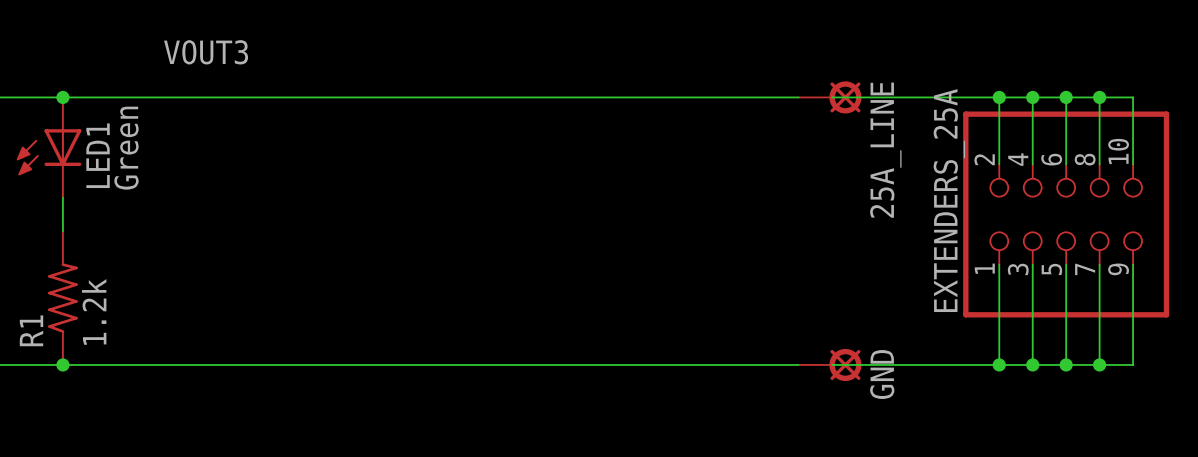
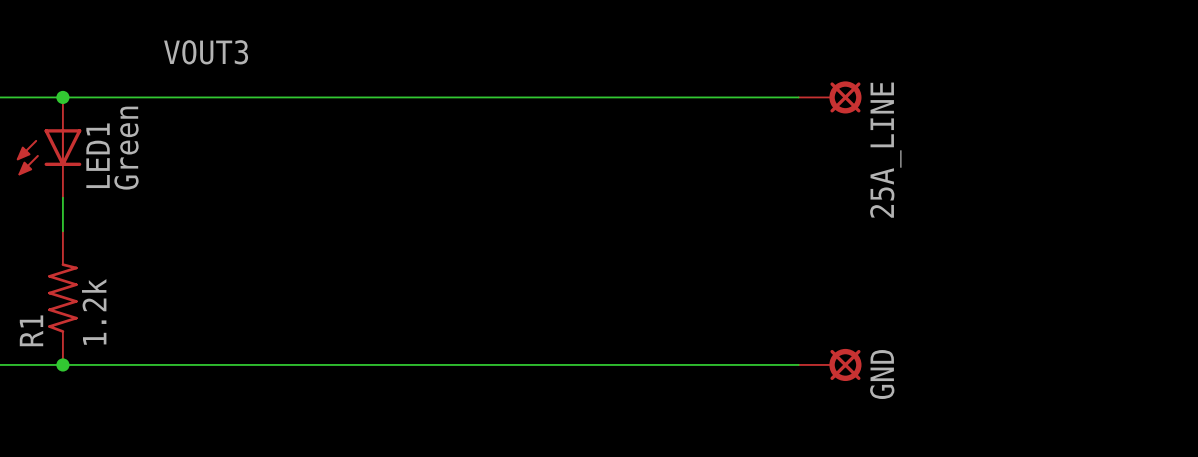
wire: (832, 97) (1133, 97) (1133, 164) -> none
wire: (999, 97) (999, 164) -> none
junction: (999, 97) -> none
wire: (1032, 97) (1032, 164) -> none
junction: (1032, 97) -> none
wire: (1066, 97) (1066, 164) -> none
junction: (1066, 97) -> none
wire: (1099, 97) (1099, 164) -> none
junction: (1099, 97) -> none
EXTENDERS_25A: (1066, 214) -> none
wire: (999, 264) (999, 364) -> none
wire: (1032, 264) (1032, 364) -> none
wire: (1066, 264) (1066, 364) -> none
wire: (1099, 264) (1099, 364) -> none
wire: (1133, 264) (1133, 364) (832, 364) -> none
junction: (999, 364) -> none
junction: (1032, 364) -> none
junction: (1066, 364) -> none
junction: (1099, 364) -> none

